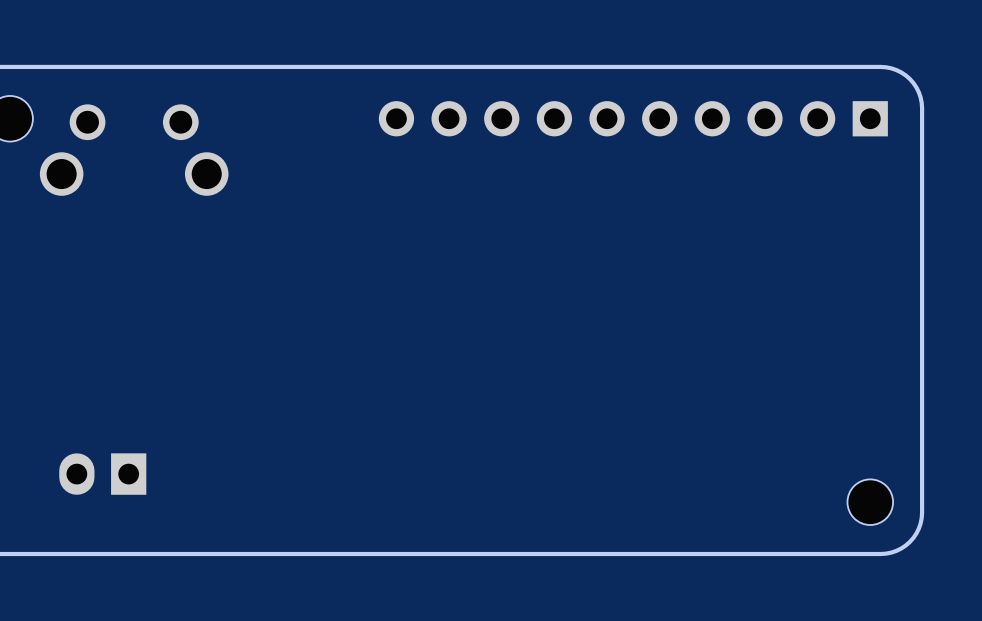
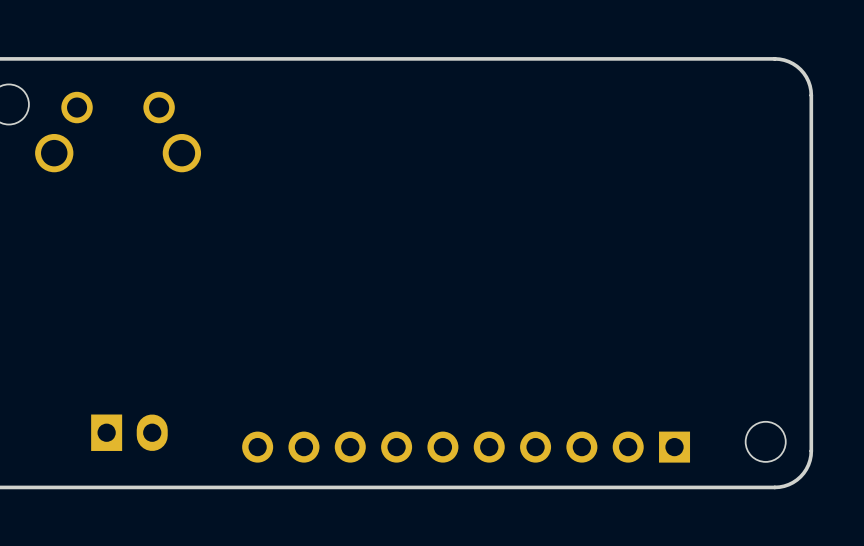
part position: (633, 118) -> (466, 447)
part rotation: 0° (102, 474) -> 180° (129, 432)

